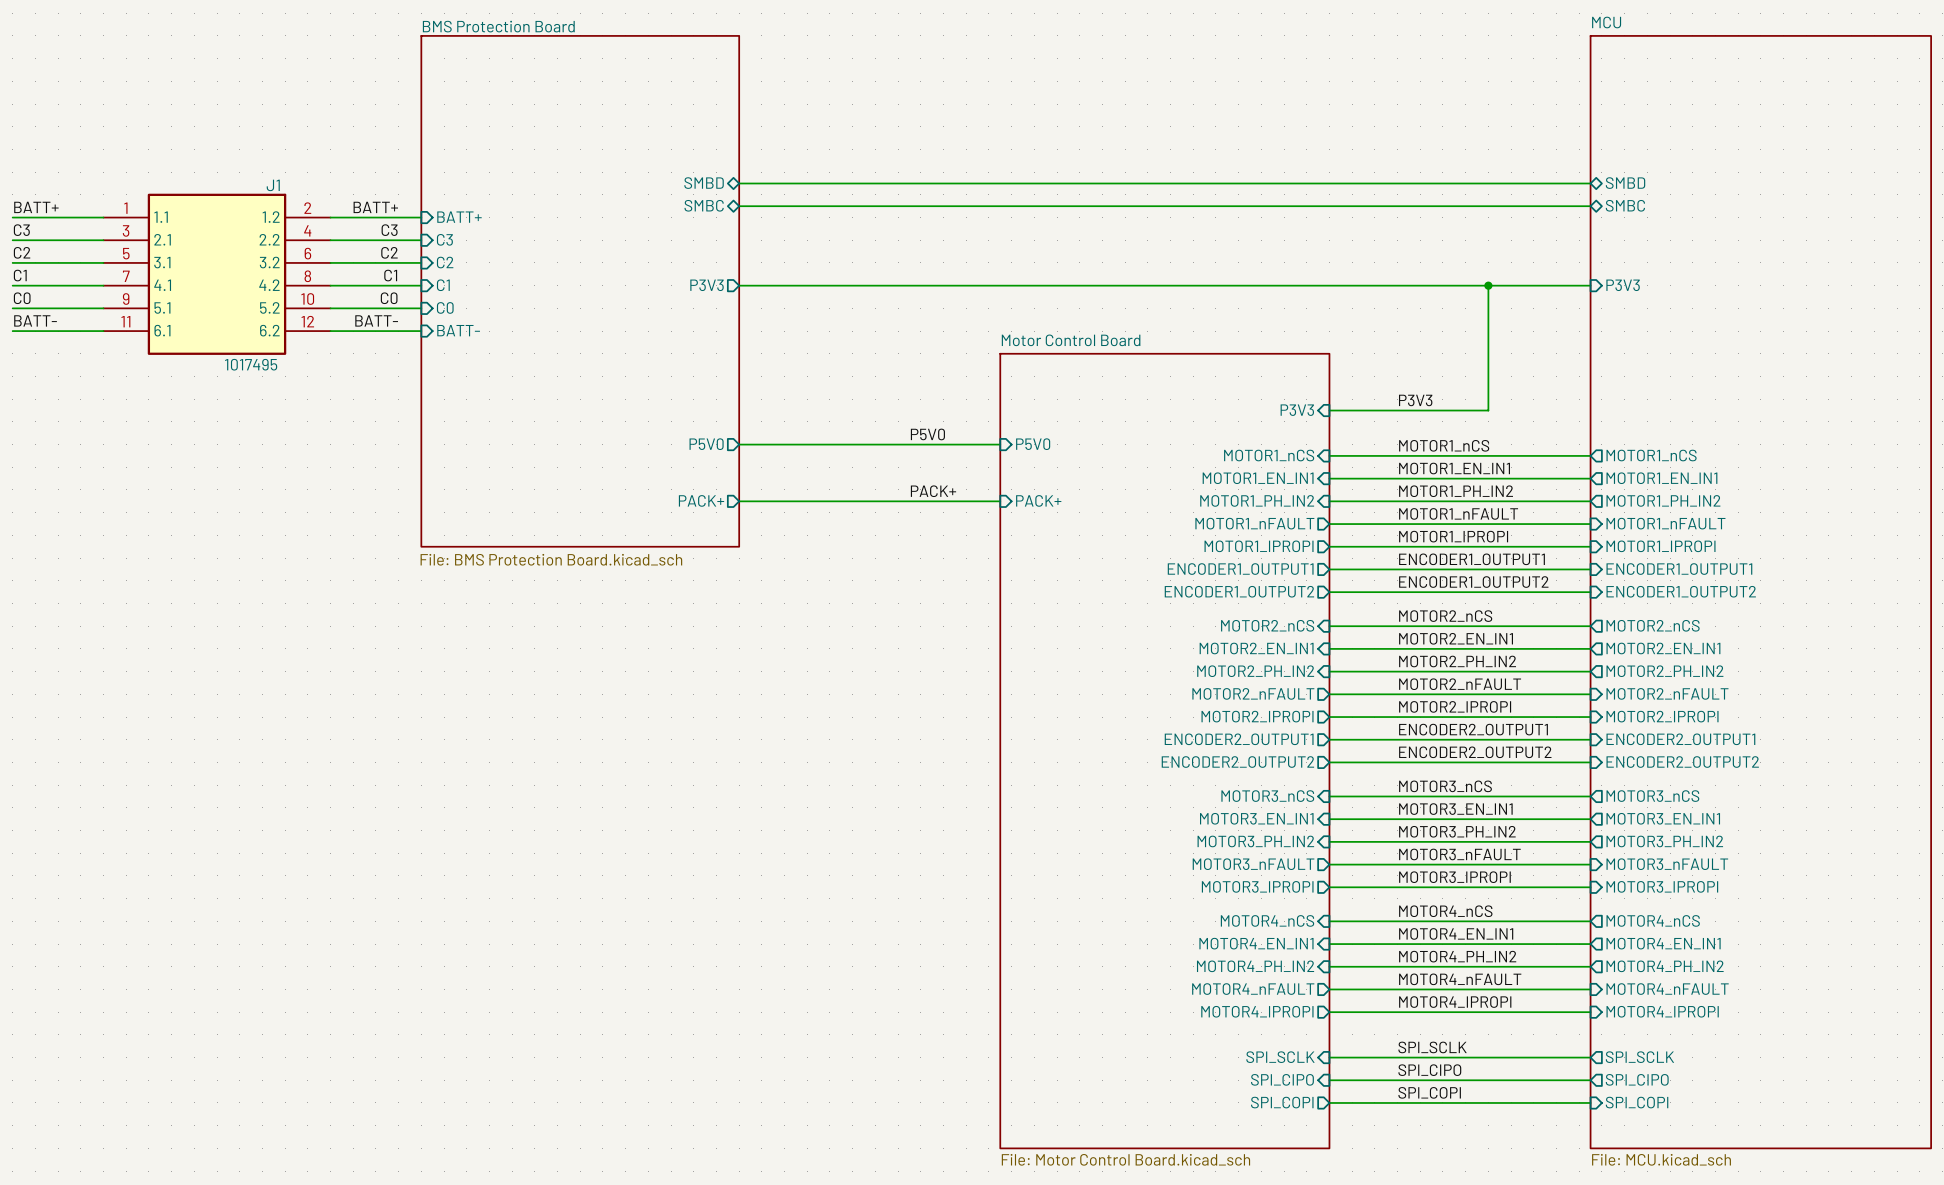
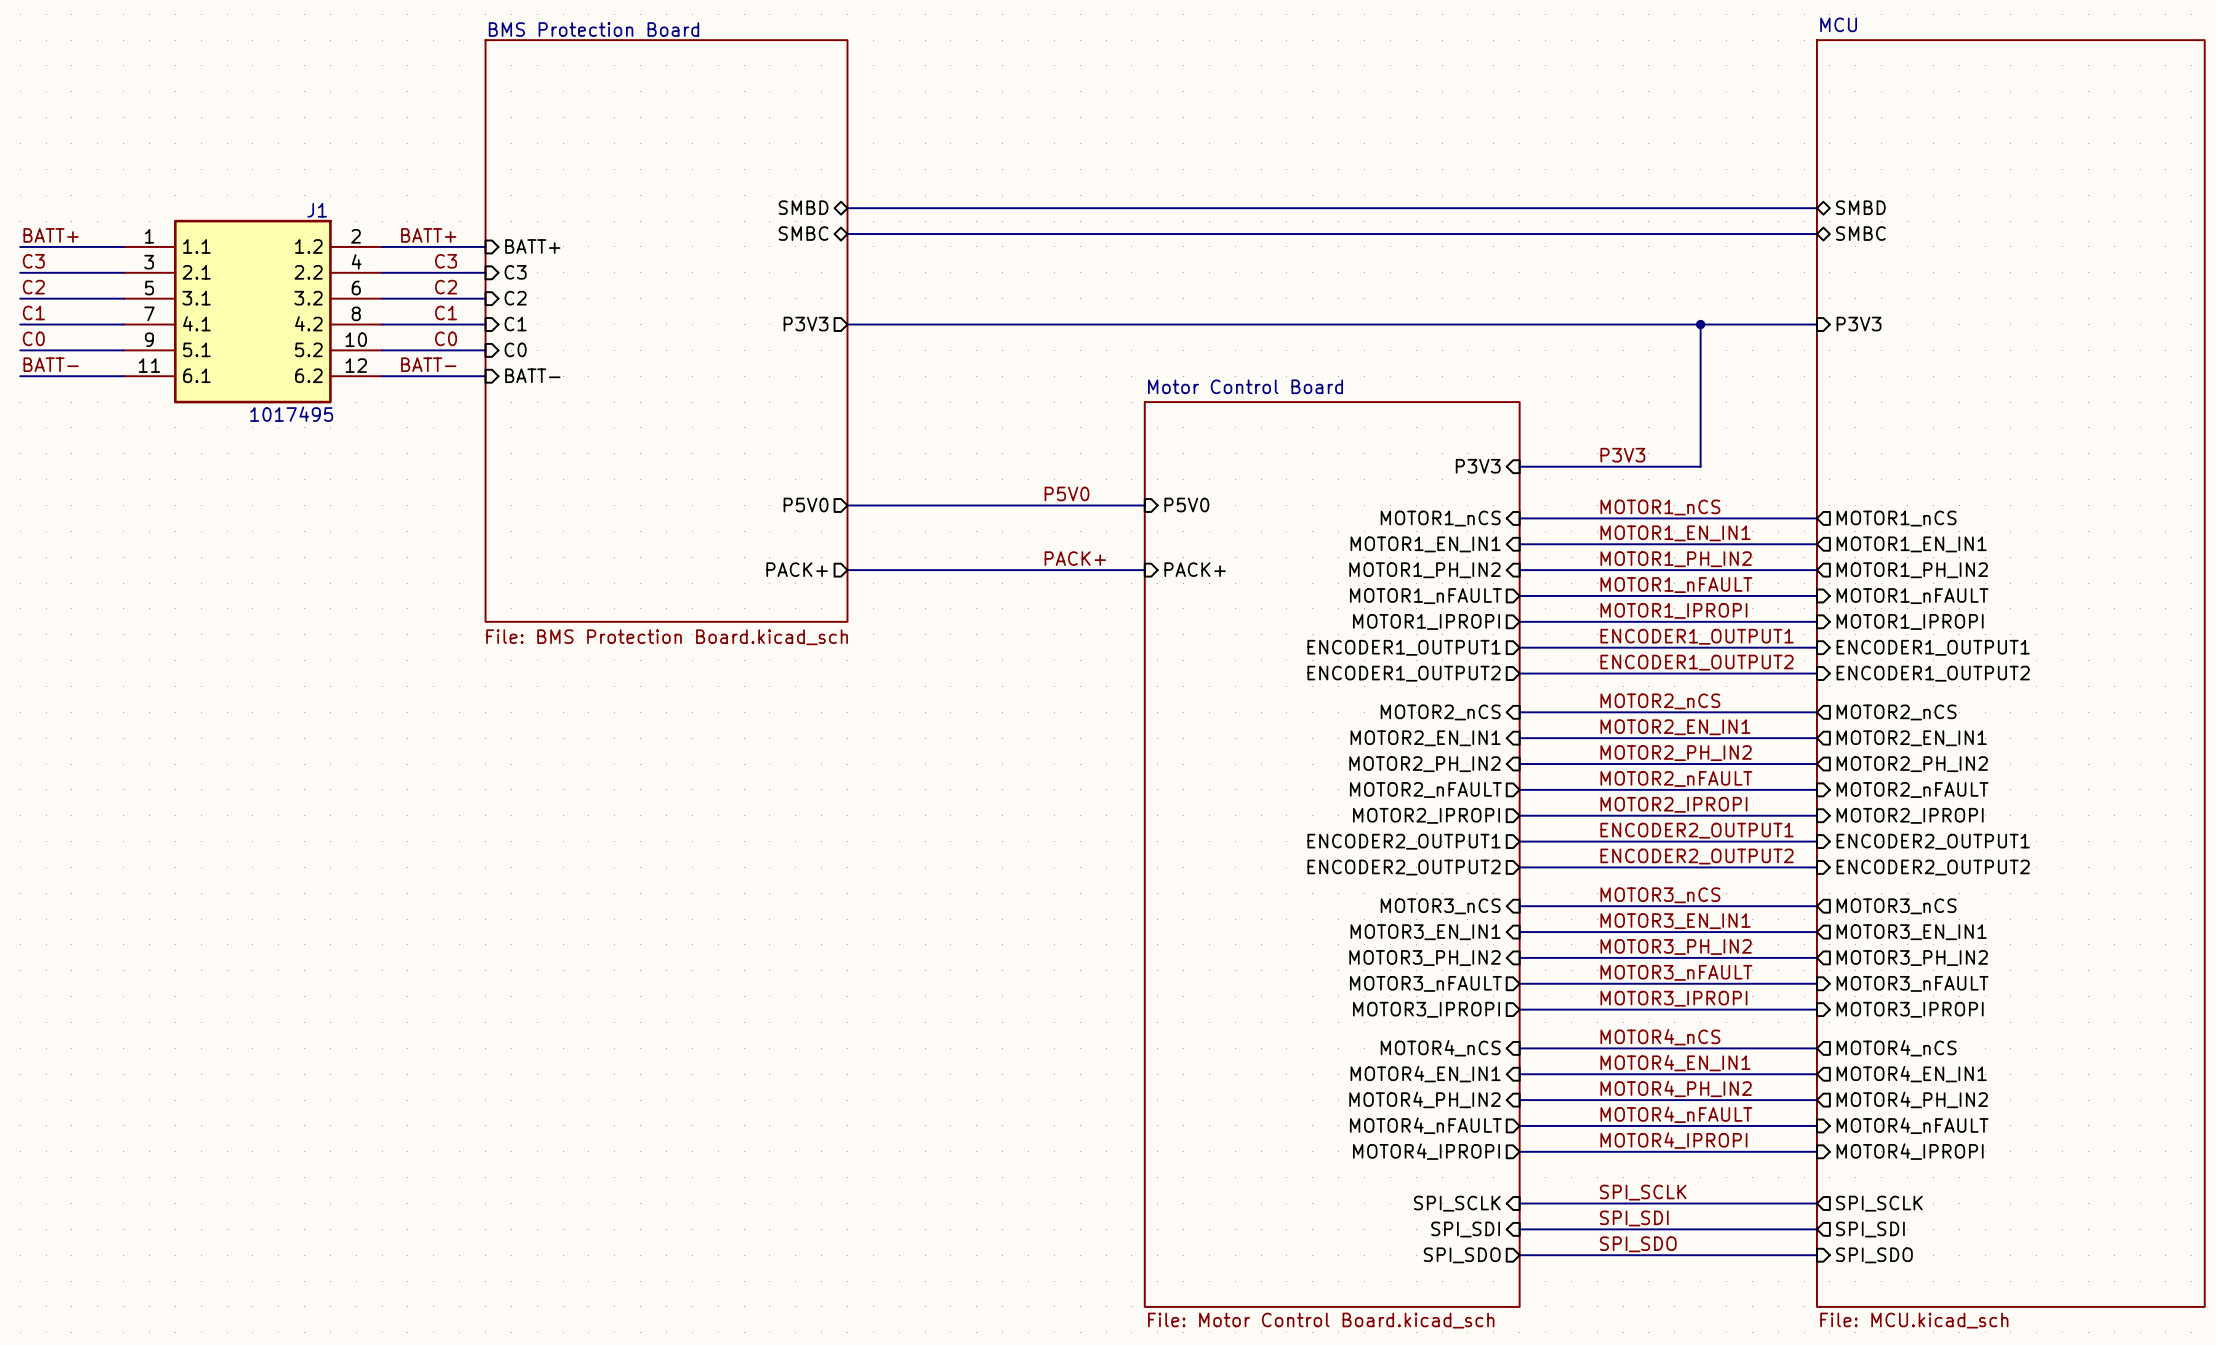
label: SPI_CIPO (1429, 1070) -> SPI_SDI (1634, 1218)
sheet pin: SPI_CIPO (1282, 1079) -> SPI_SDI (1465, 1229)
sheet pin: SPI_CIPO (1637, 1079) -> SPI_SDI (1870, 1229)
label: SPI_COPI (1429, 1092) -> SPI_SDO (1638, 1244)
sheet pin: SPI_COPI (1282, 1102) -> SPI_SDO (1462, 1255)
sheet pin: SPI_COPI (1637, 1102) -> SPI_SDO (1874, 1255)

